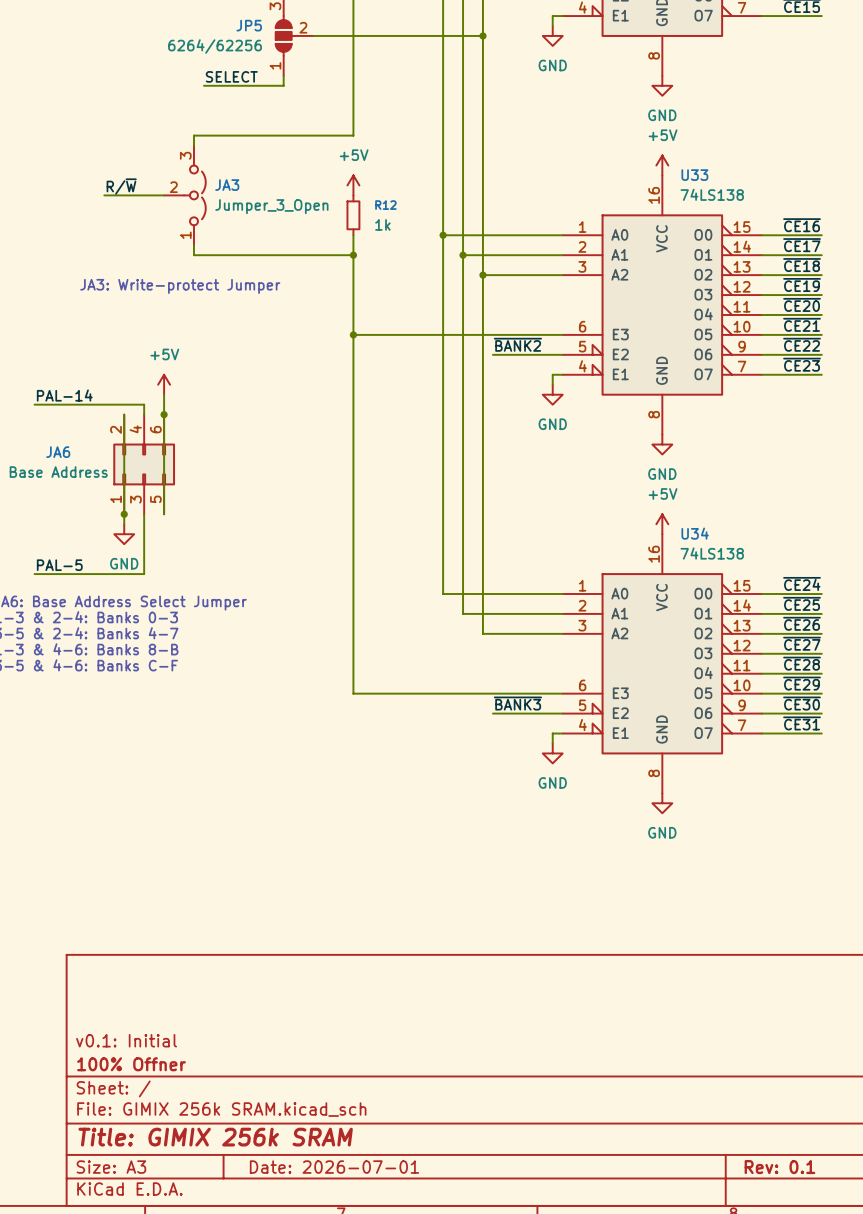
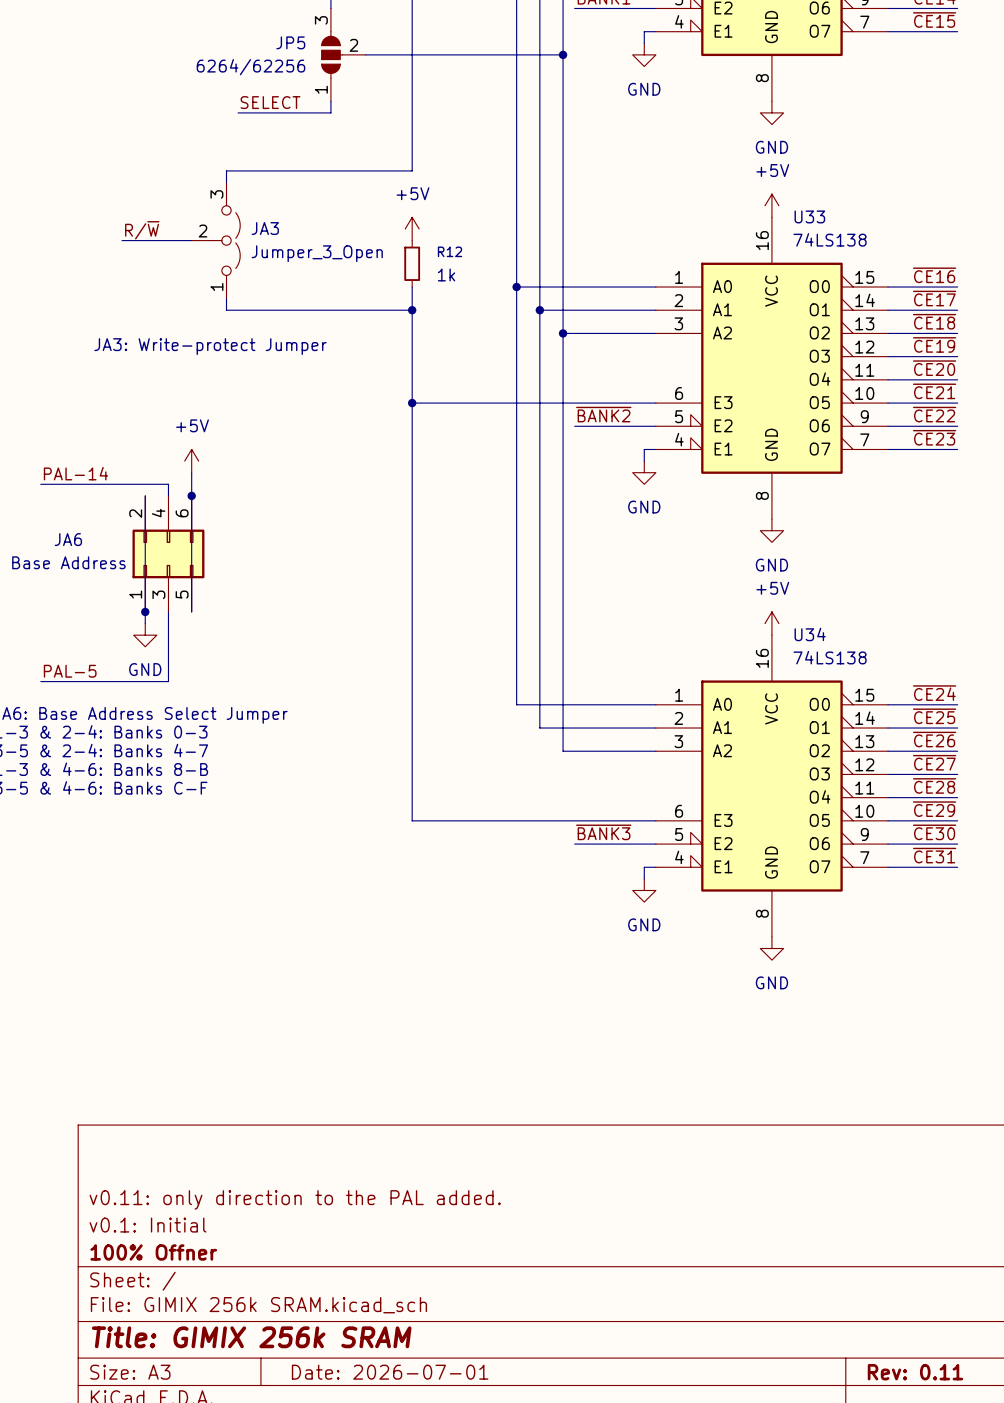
title block: none -> v0.11: only direction to the PAL added. (295, 1199)
title block: Rev: 0.1 (779, 1167) -> Rev: 0.11 (915, 1372)

